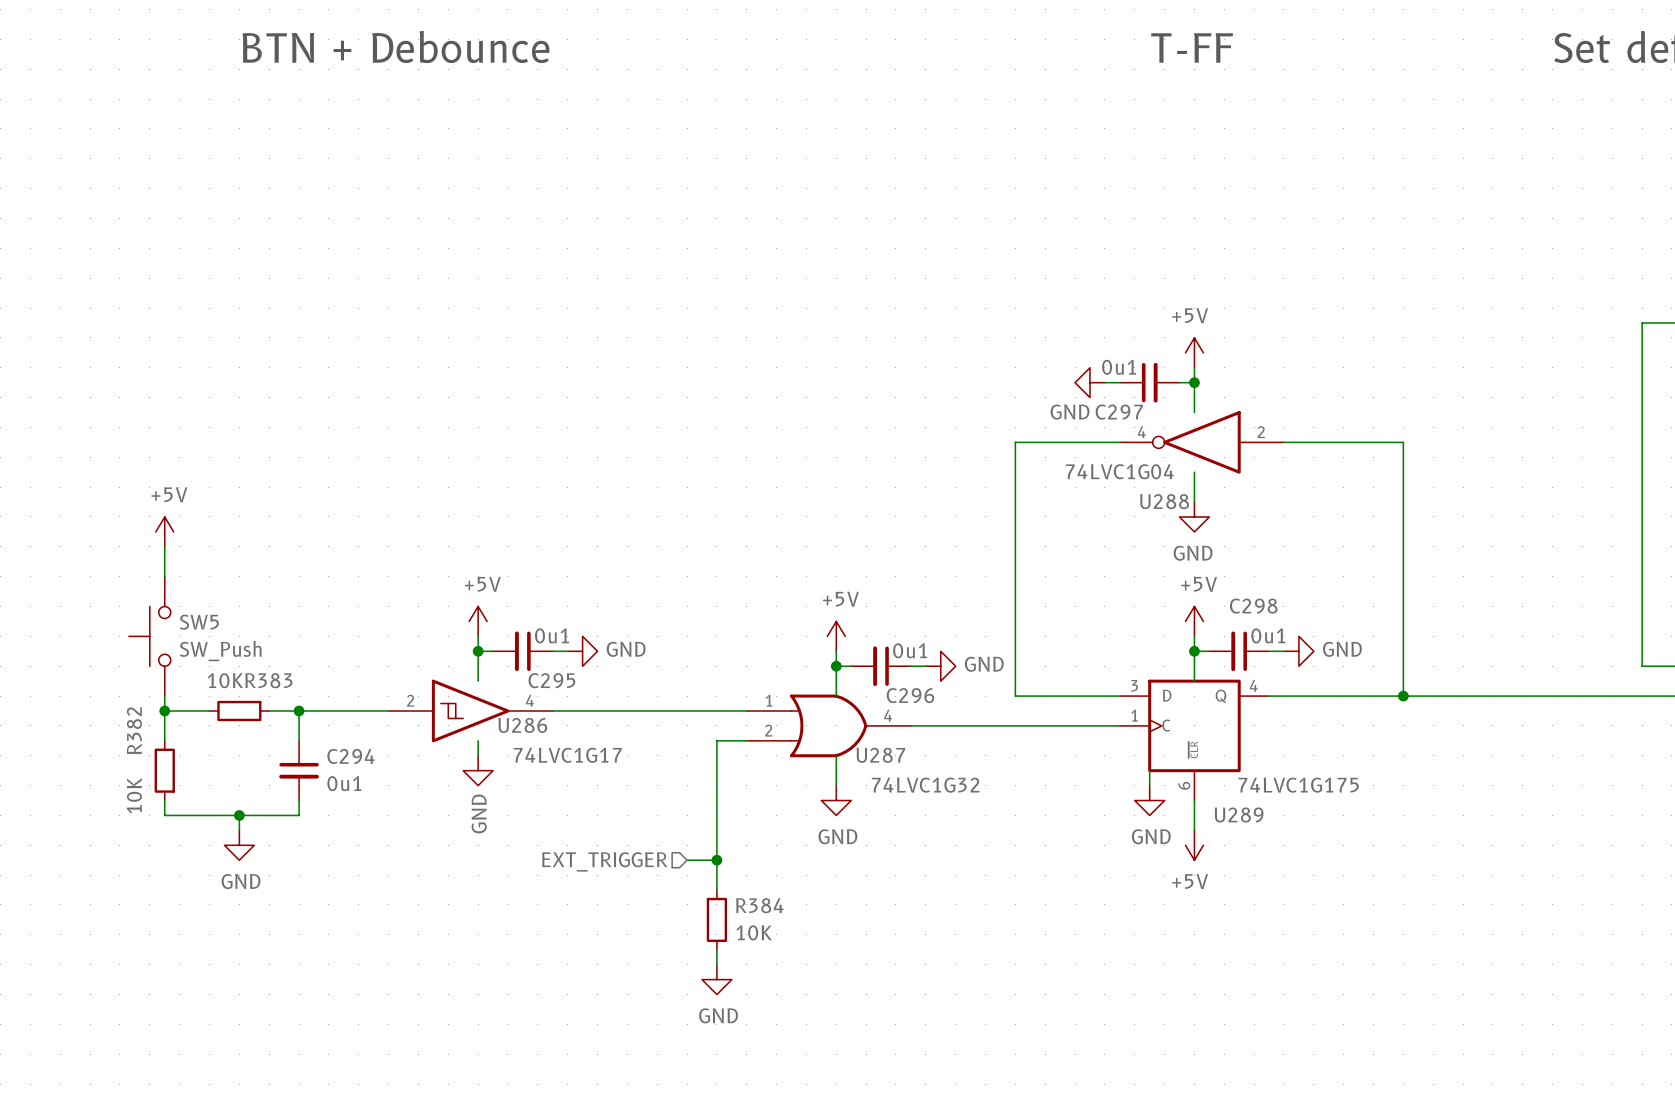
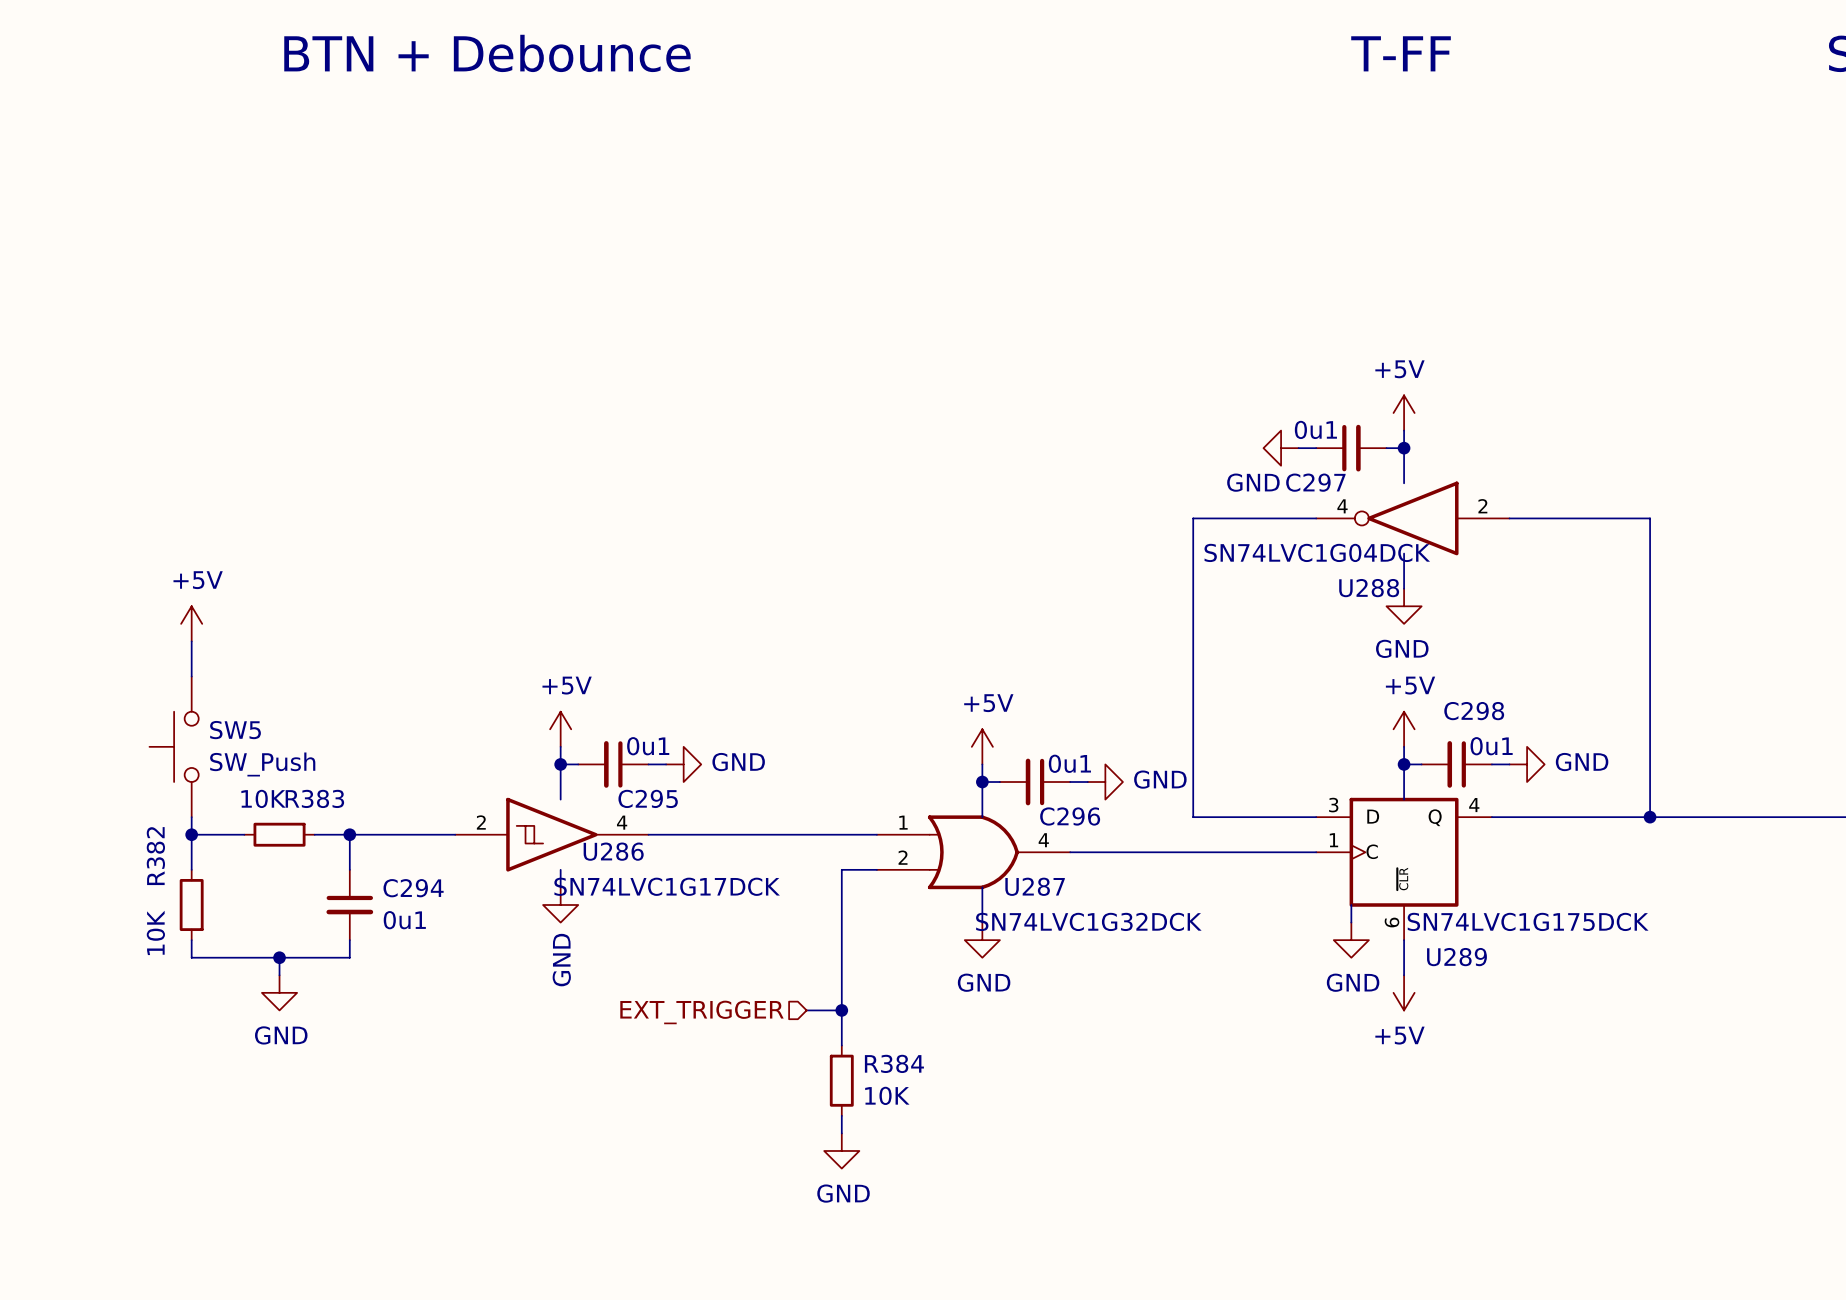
U288 value: 74LVC1G04 (1119, 471) -> SN74LVC1G04DCK (1317, 552)
U286 value: 74LVC1G17 (567, 755) -> SN74LVC1G17DCK (667, 886)
U287 value: 74LVC1G32 (925, 785) -> SN74LVC1G32DCK (1088, 921)
U289 value: 74LVC1G175 (1298, 785) -> SN74LVC1G175DCK (1528, 921)

